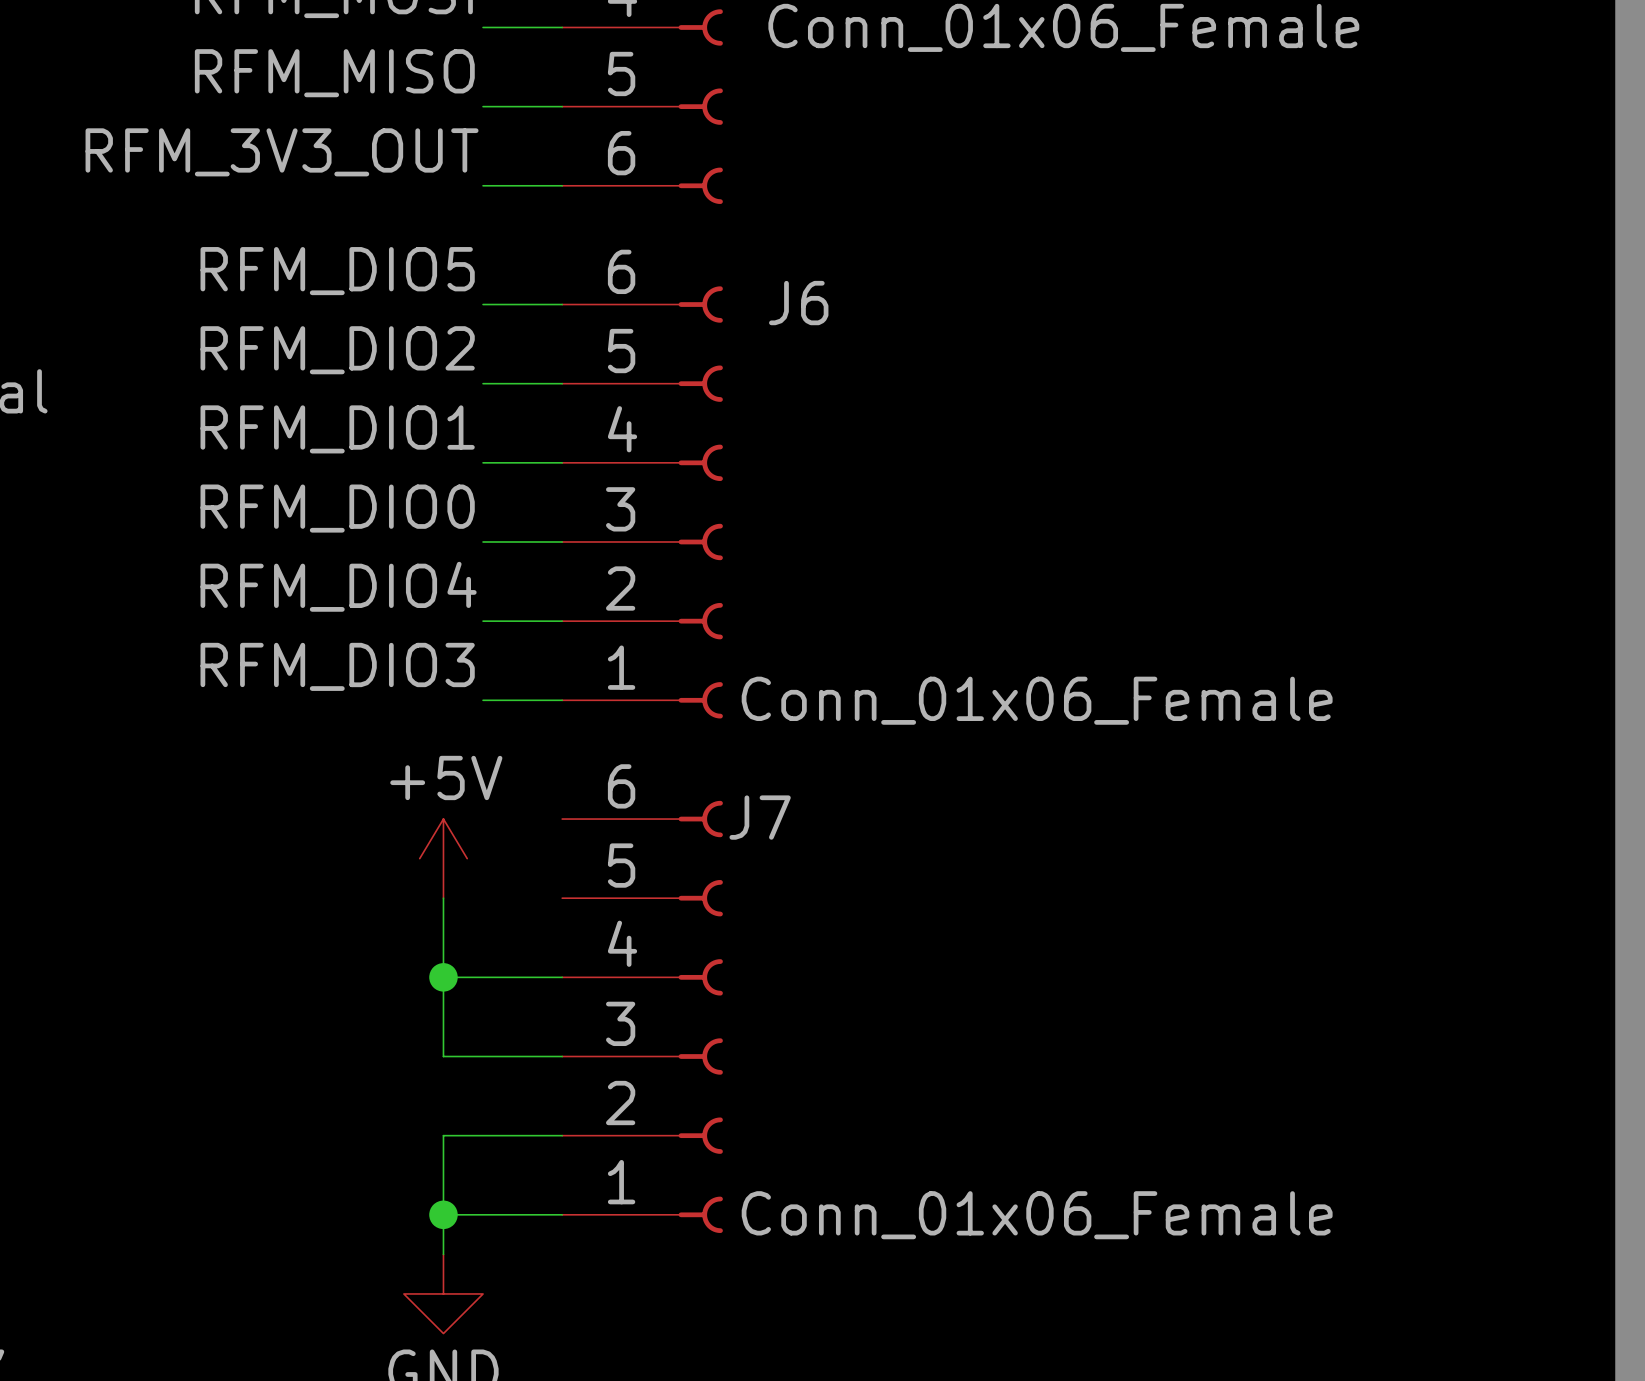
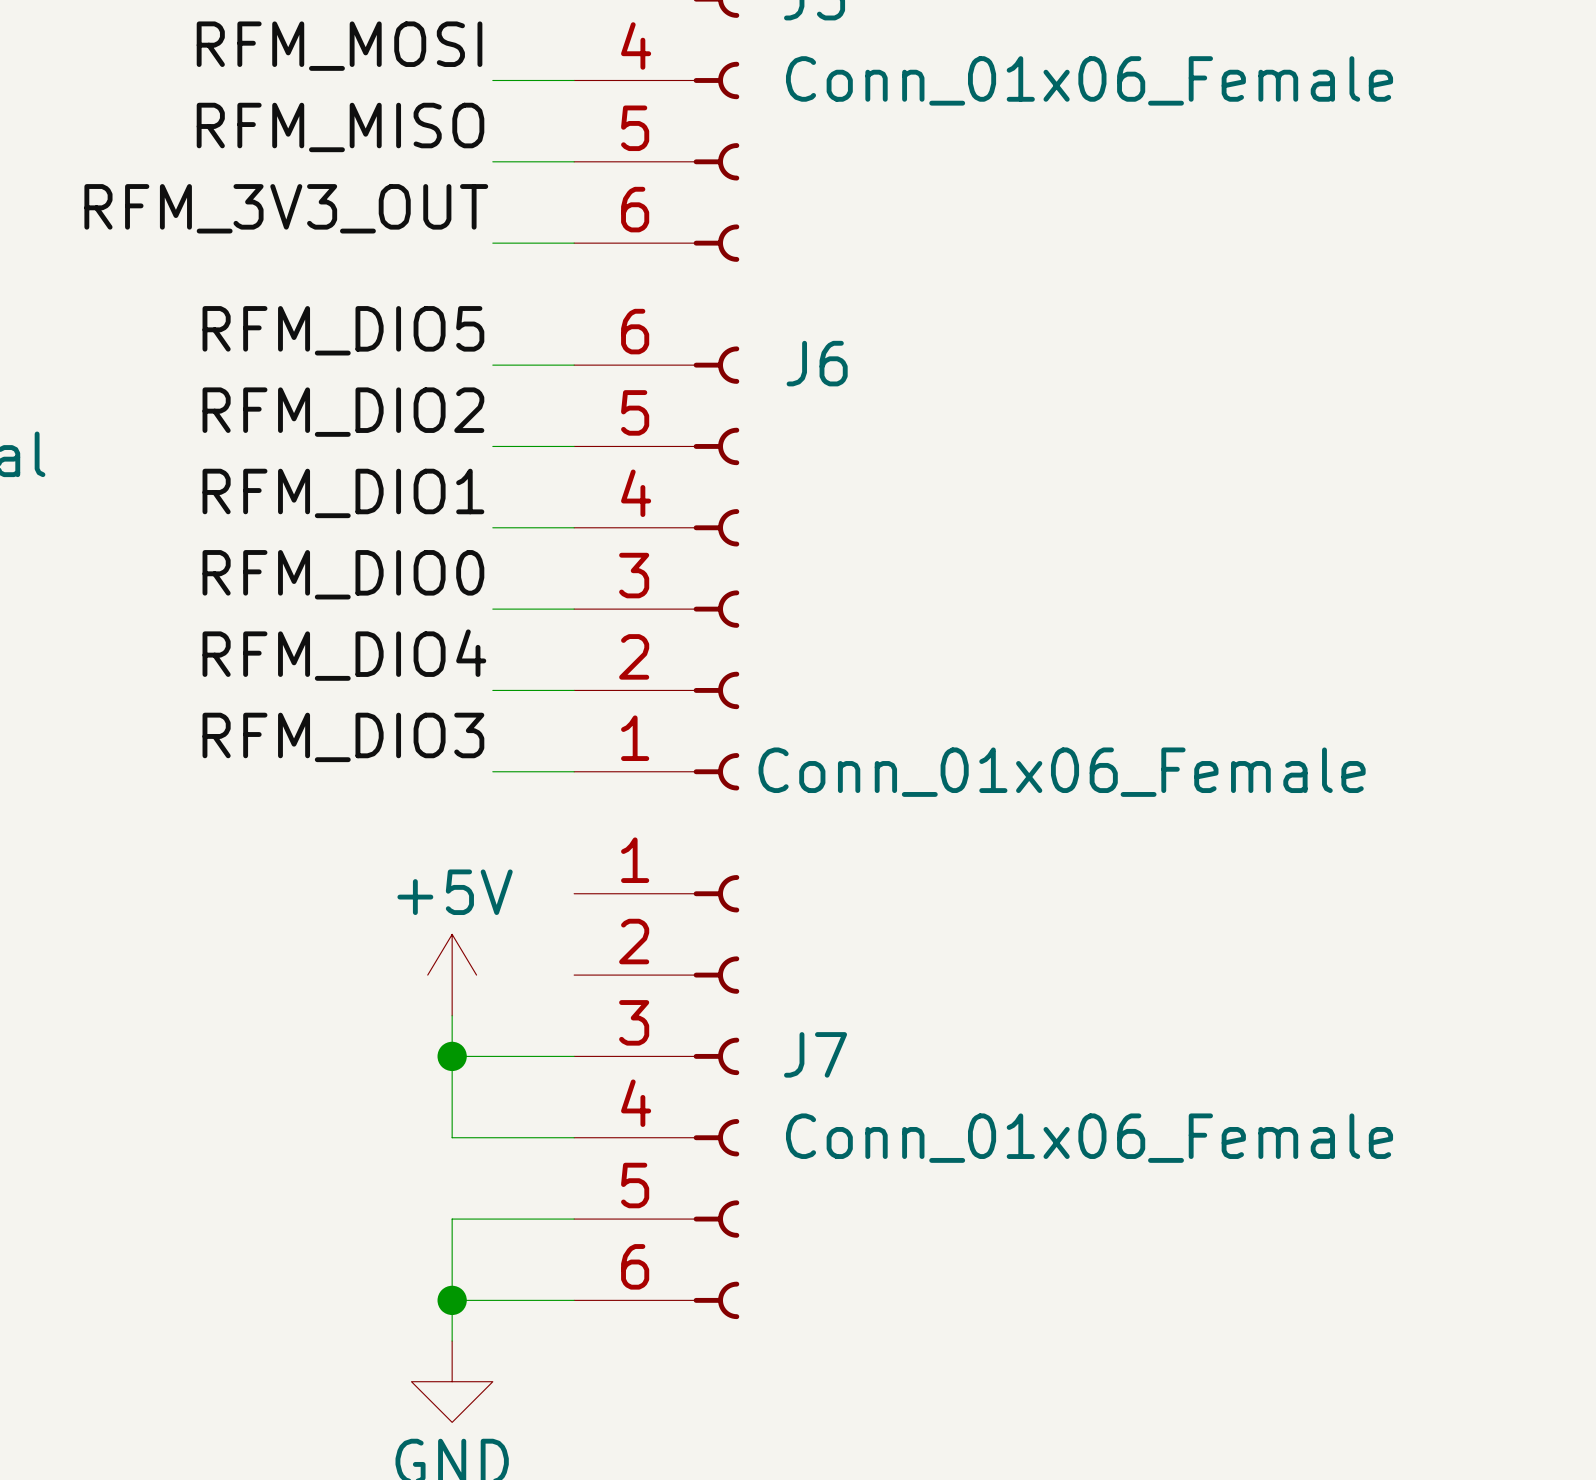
J7 name position: J7 (760, 817) -> J7 (815, 1054)
power symbol position: +5V (443, 858) -> +5V (452, 975)
J7 flip: as is (700, 1016) -> up-down (716, 1097)
J7 value position: Conn_01x06_Female (1037, 1215) -> Conn_01x06_Female (1089, 1138)

